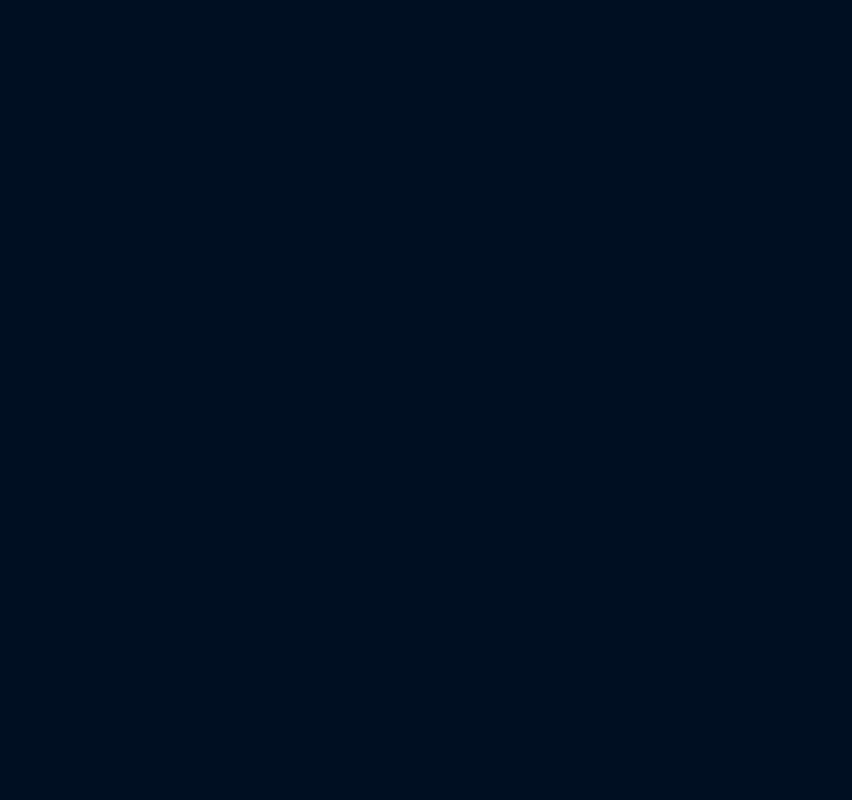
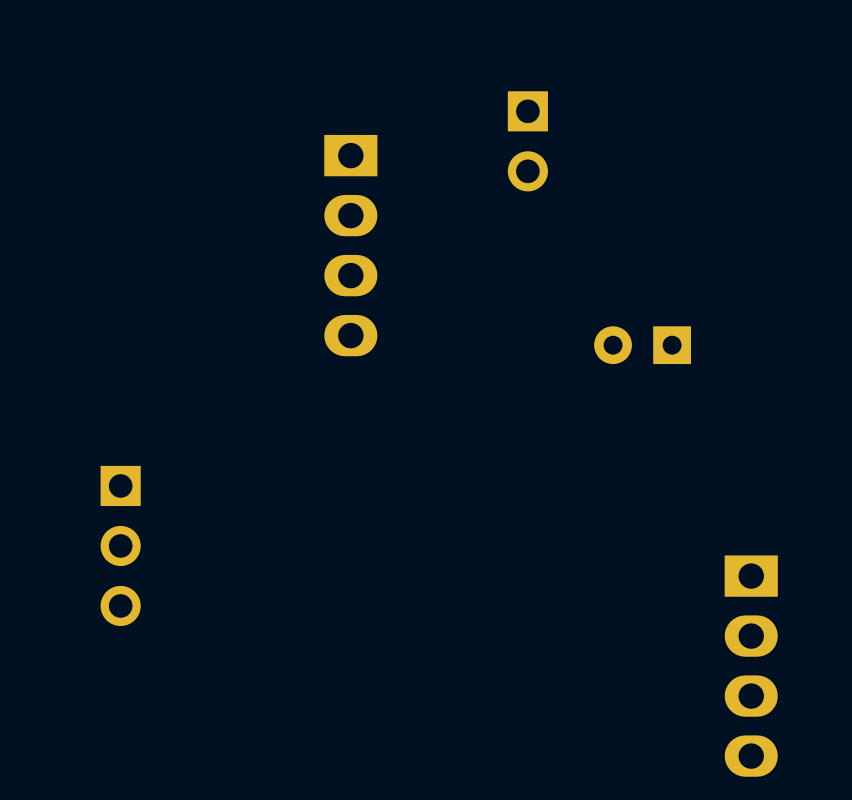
part: none -> (527, 141)
part: none -> (350, 245)
part: none -> (642, 345)
part: none -> (120, 545)
part: none -> (751, 666)

